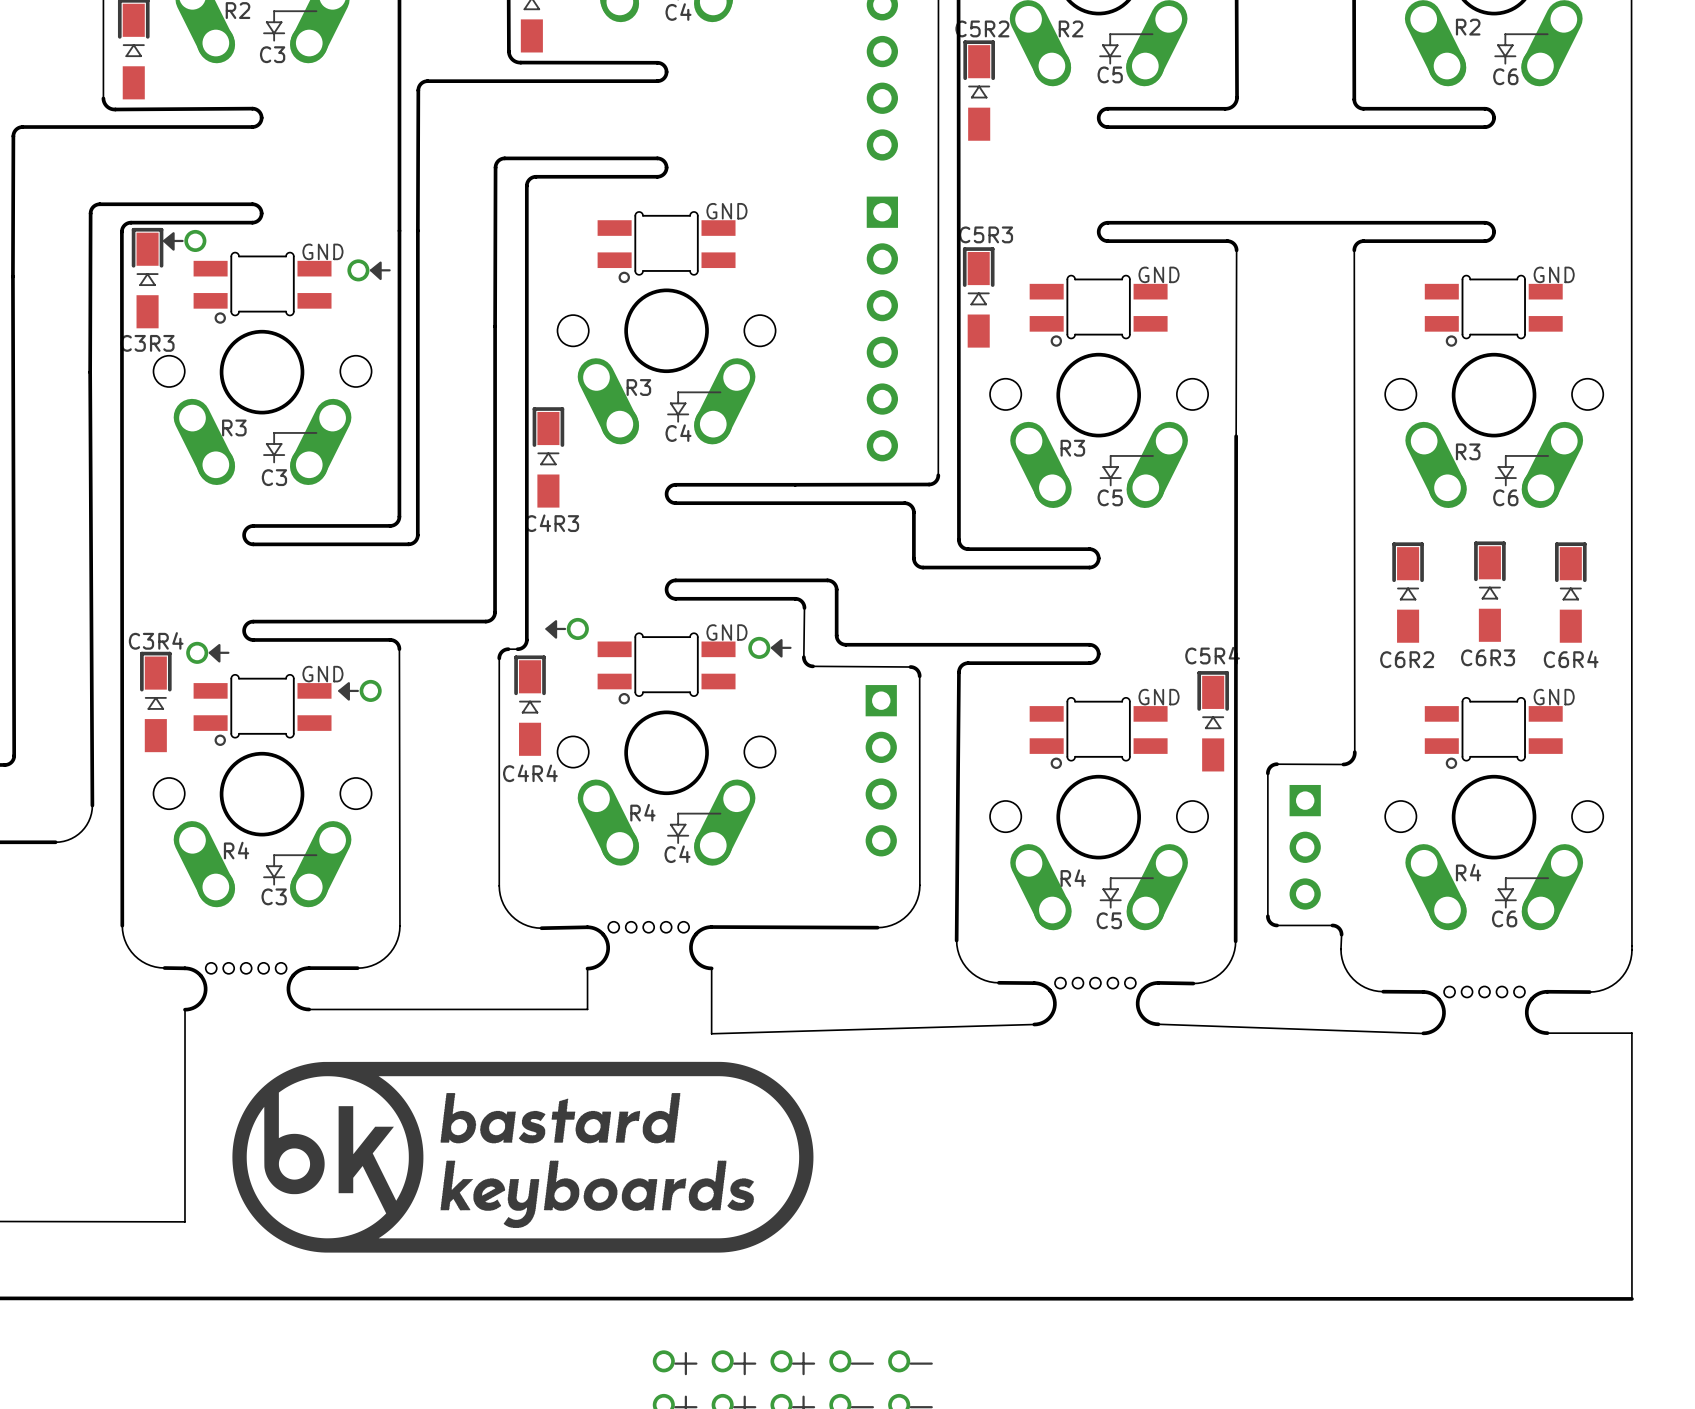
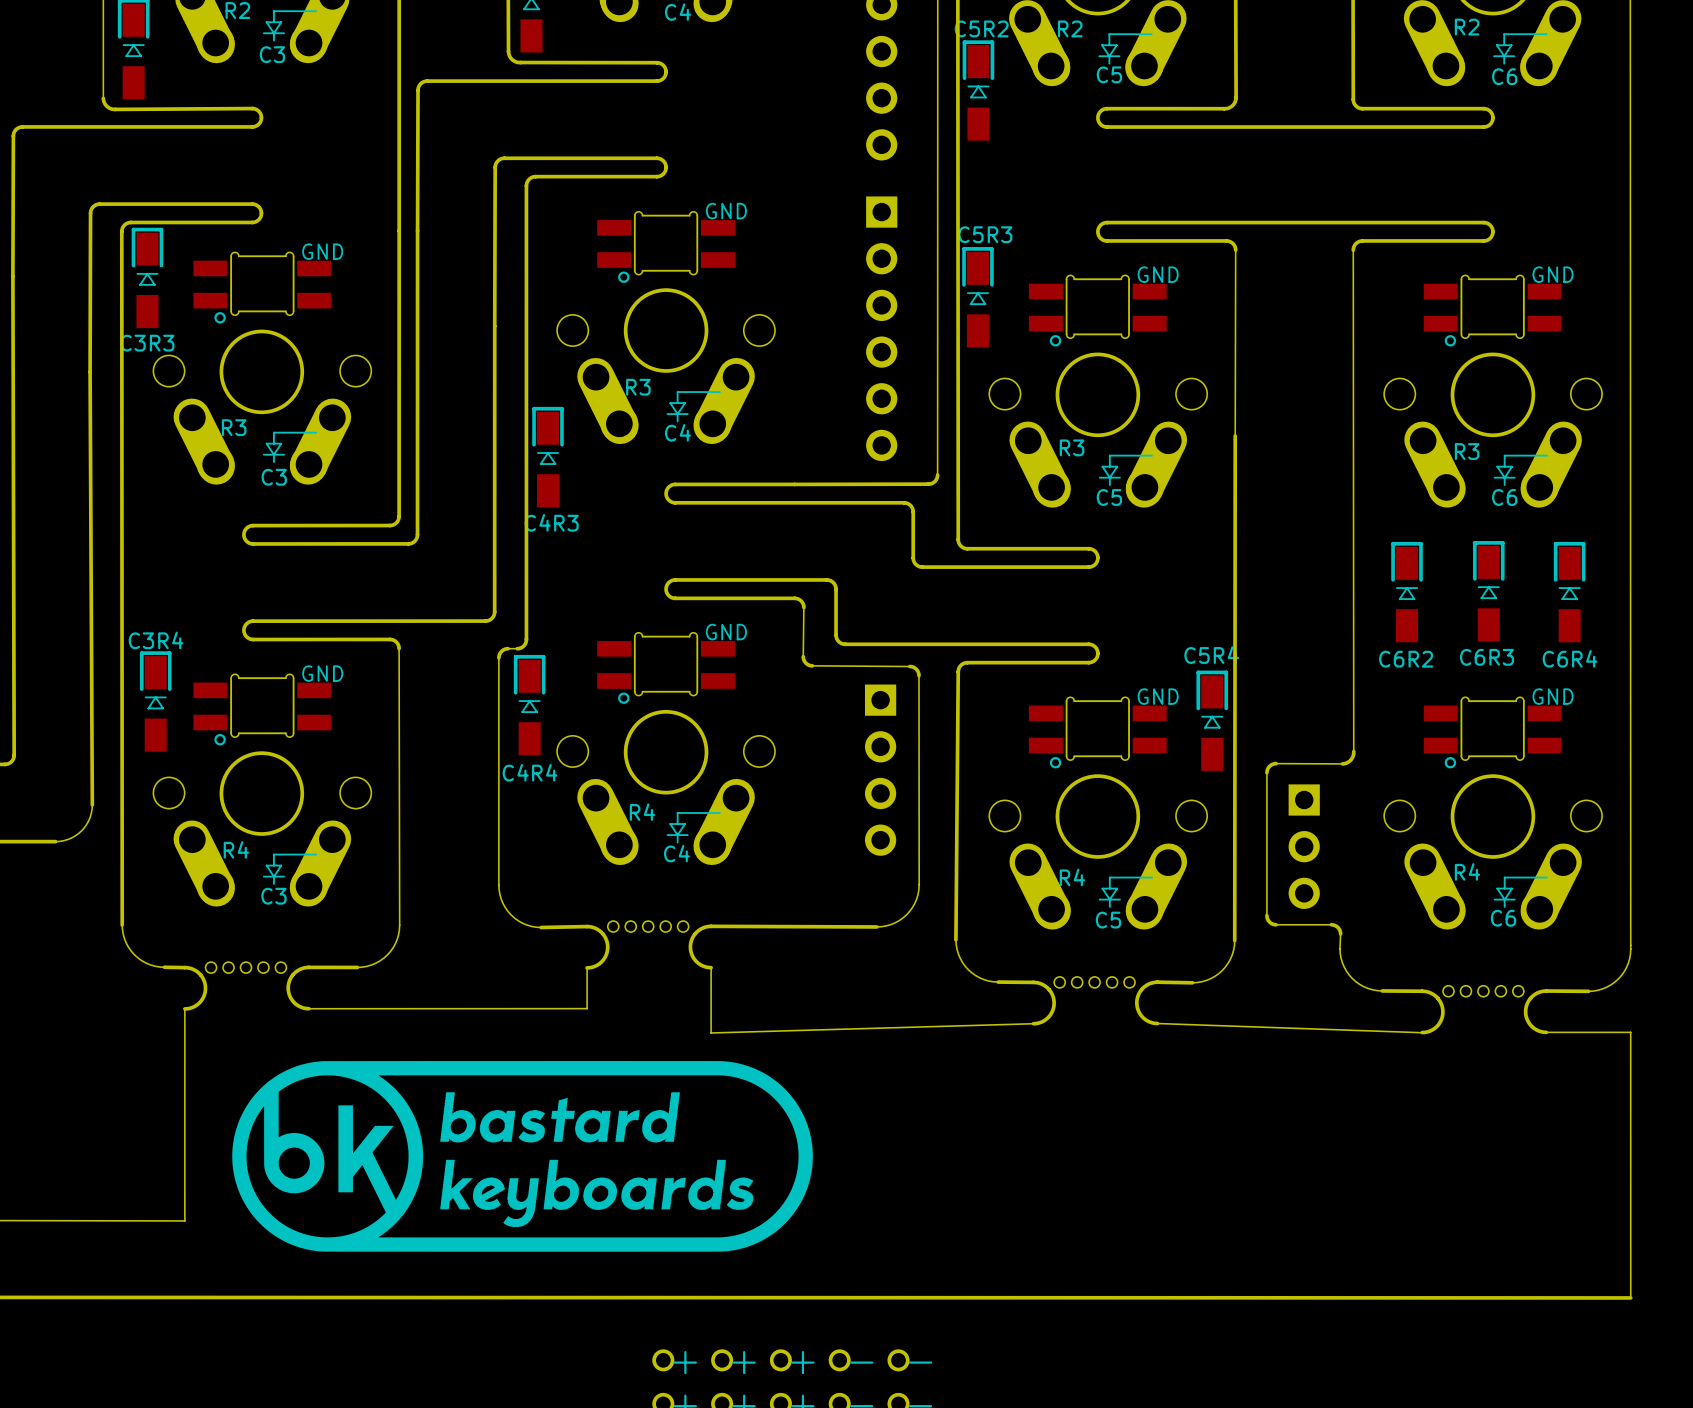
part: (184, 240) -> none
part: (369, 270) -> none
part: (567, 628) -> none
part: (769, 647) -> none
part: (207, 652) -> none
part: (359, 690) -> none

